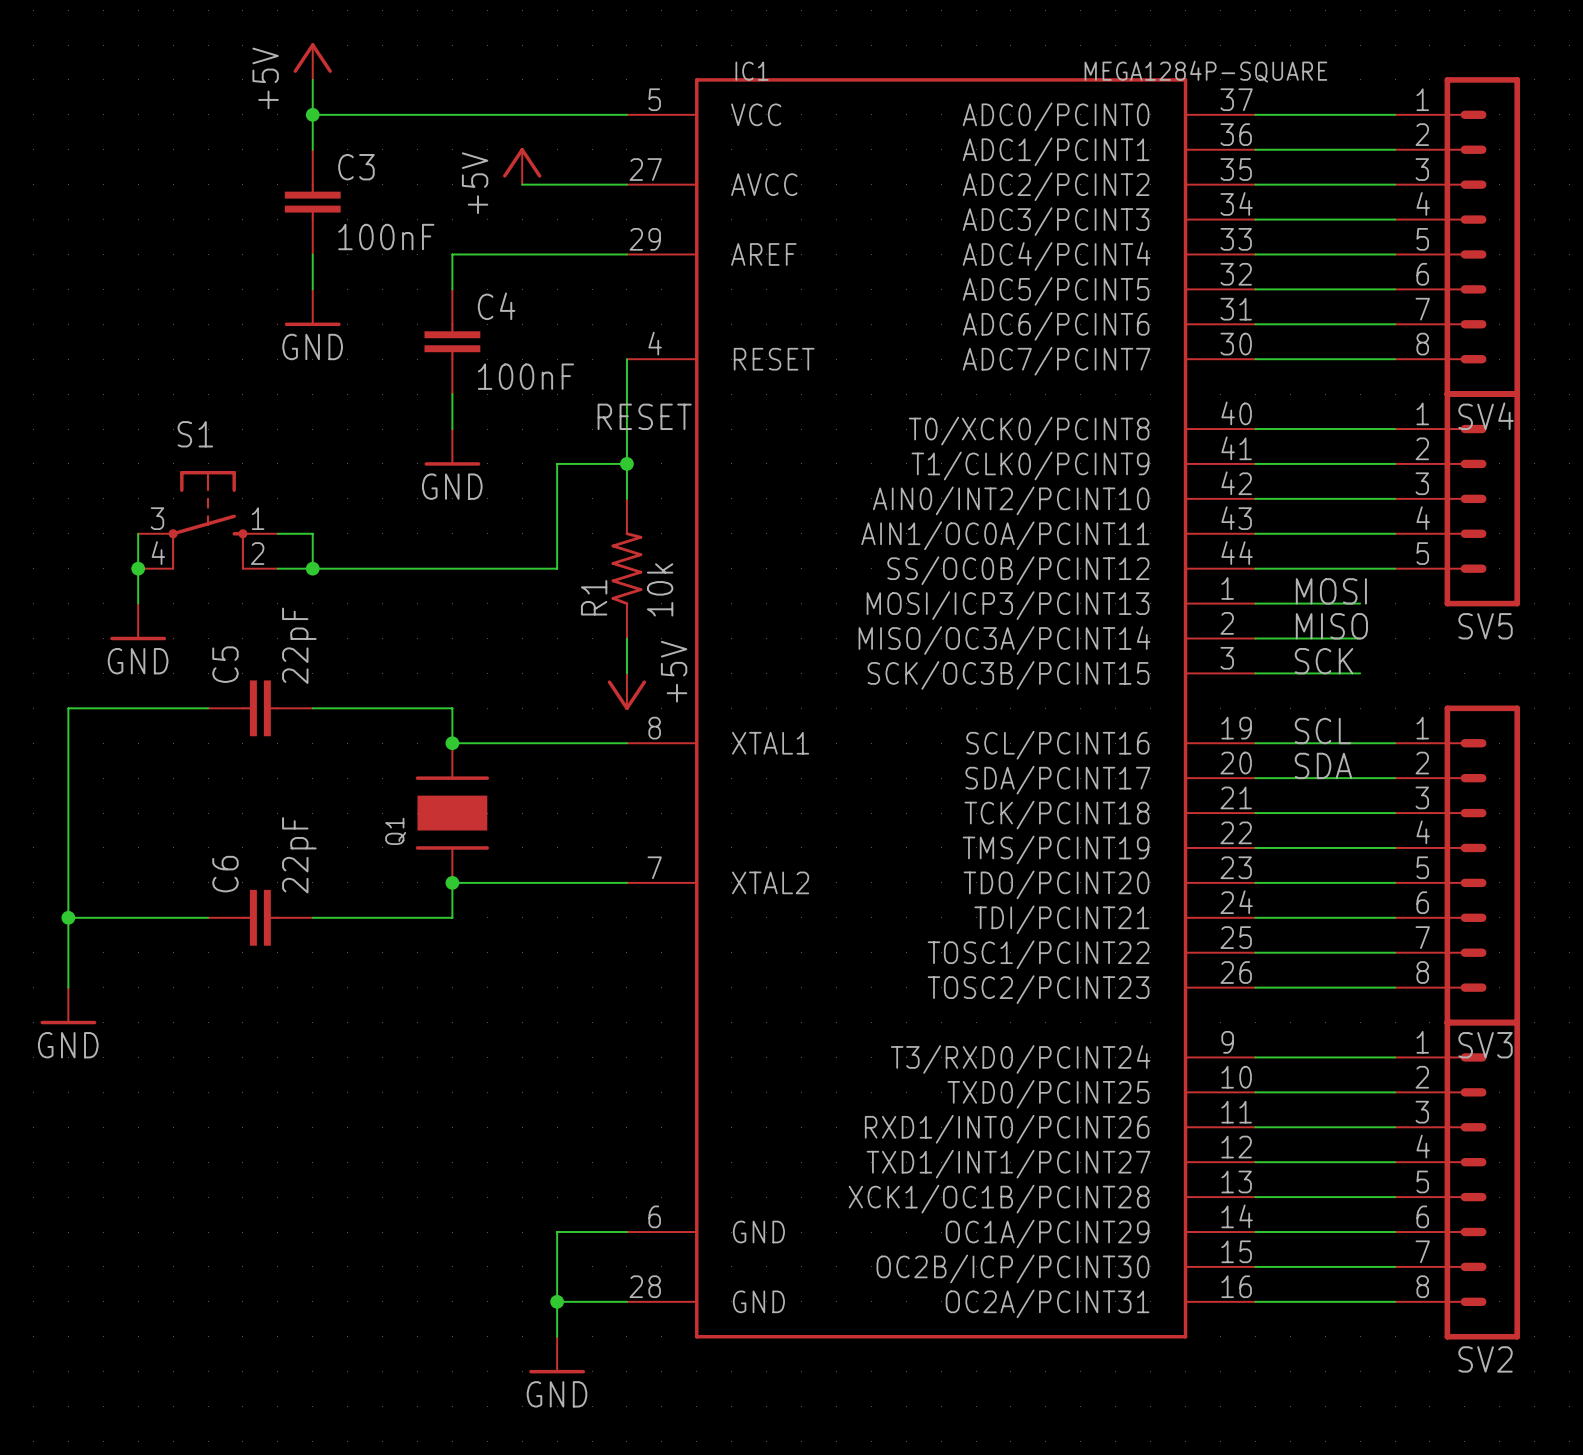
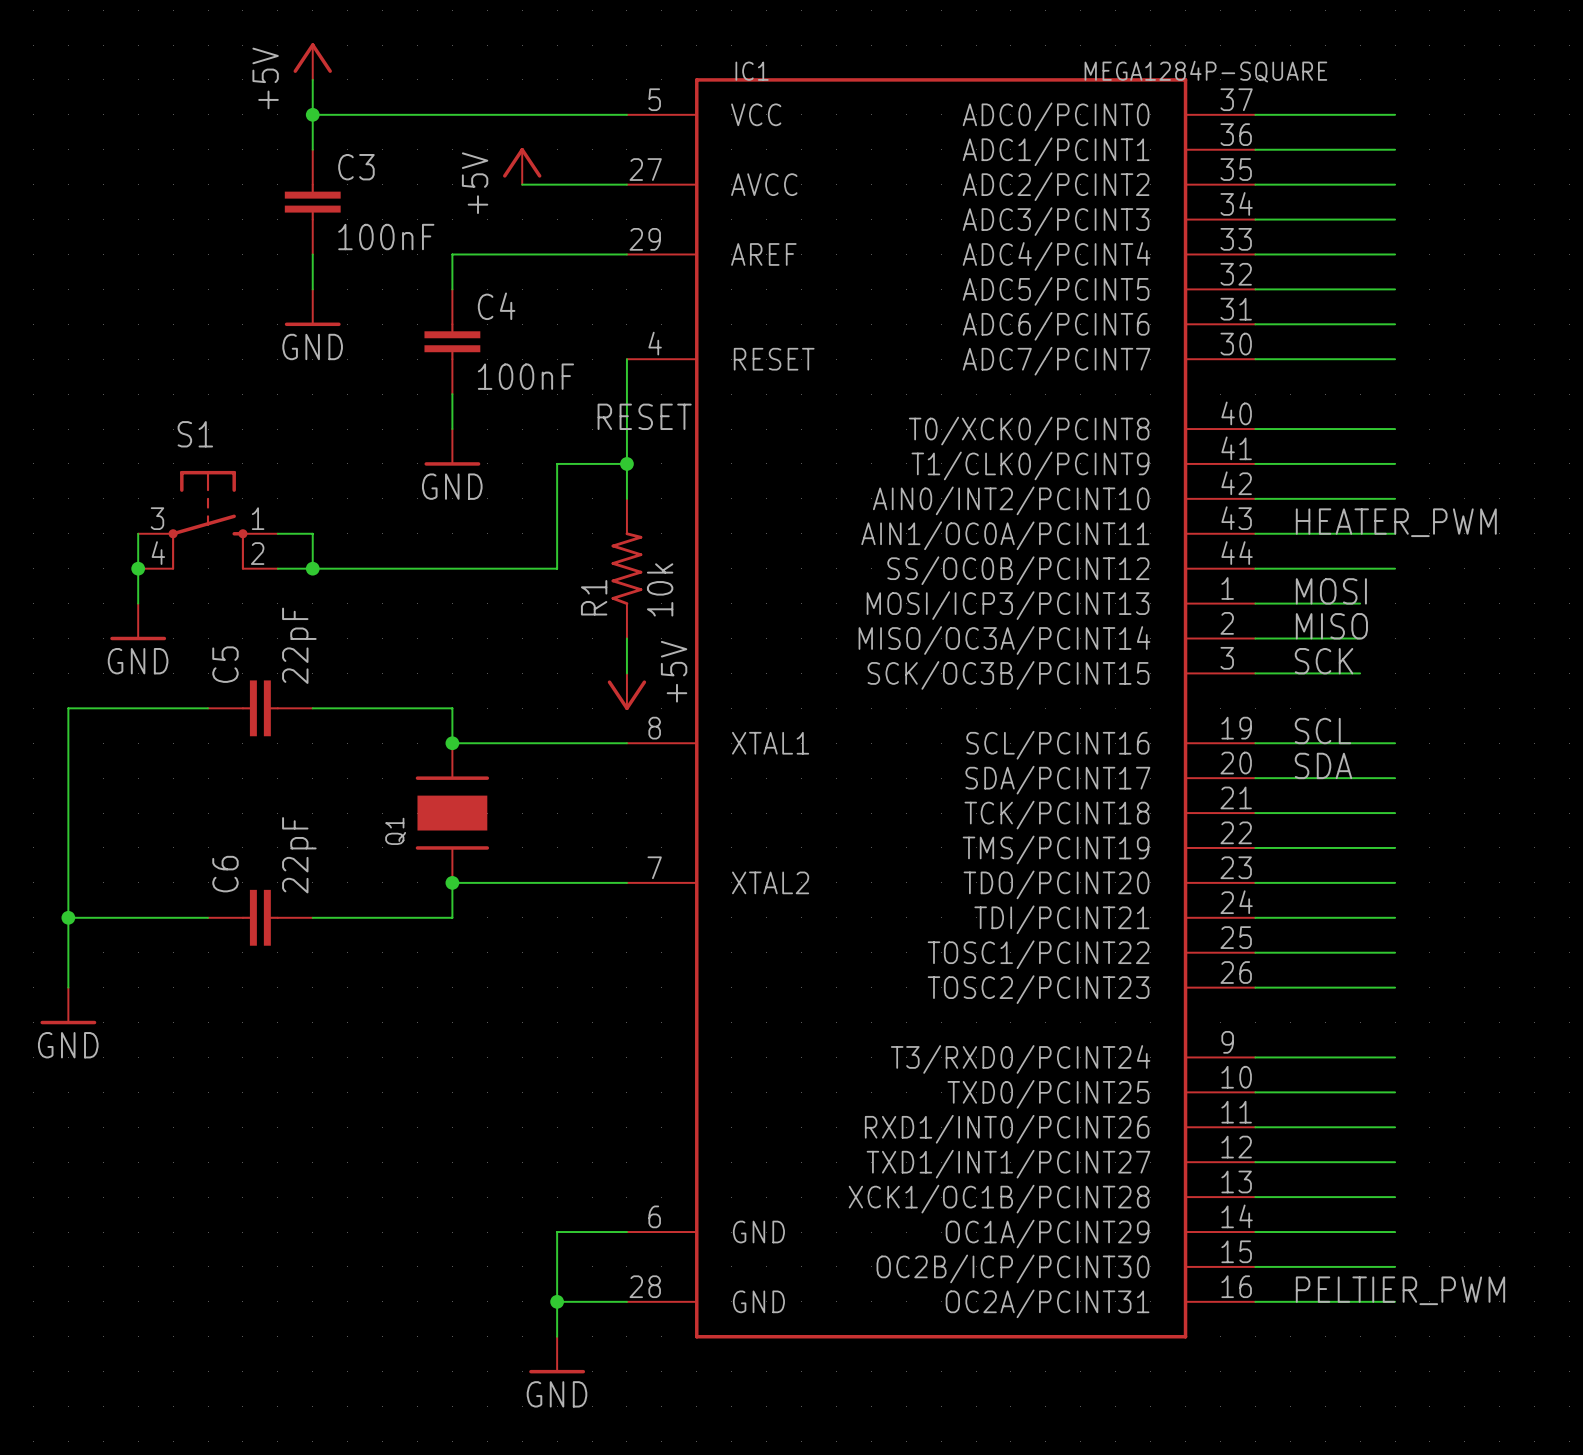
SV4: (1457, 237) -> none
SV5: (1457, 498) -> none
label: none -> HEATER_PWM (1396, 522)
SV3: (1457, 865) -> none
SV2: (1457, 1179) -> none
label: none -> PELTIER_PWM (1400, 1290)

